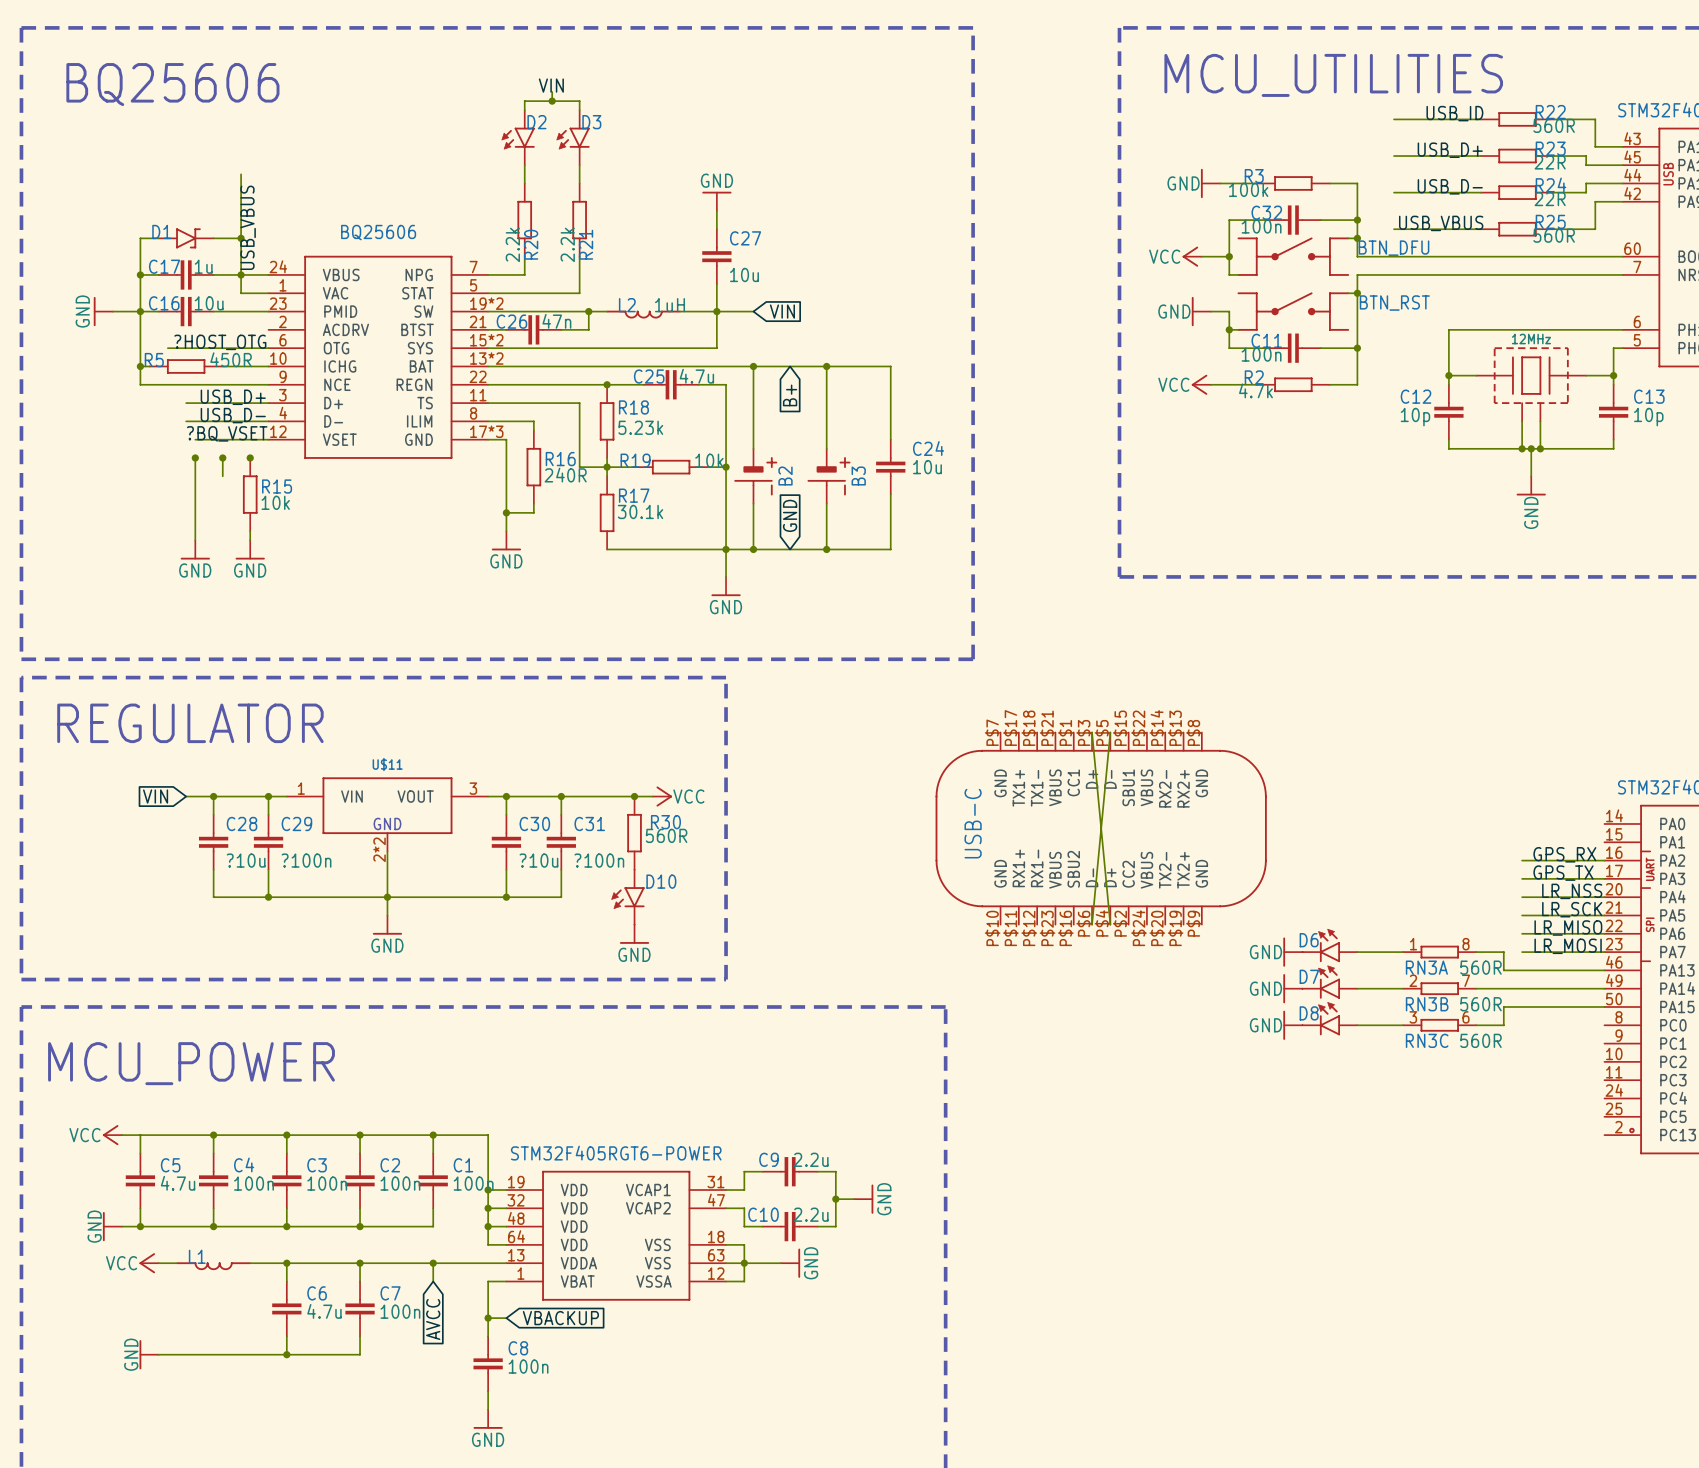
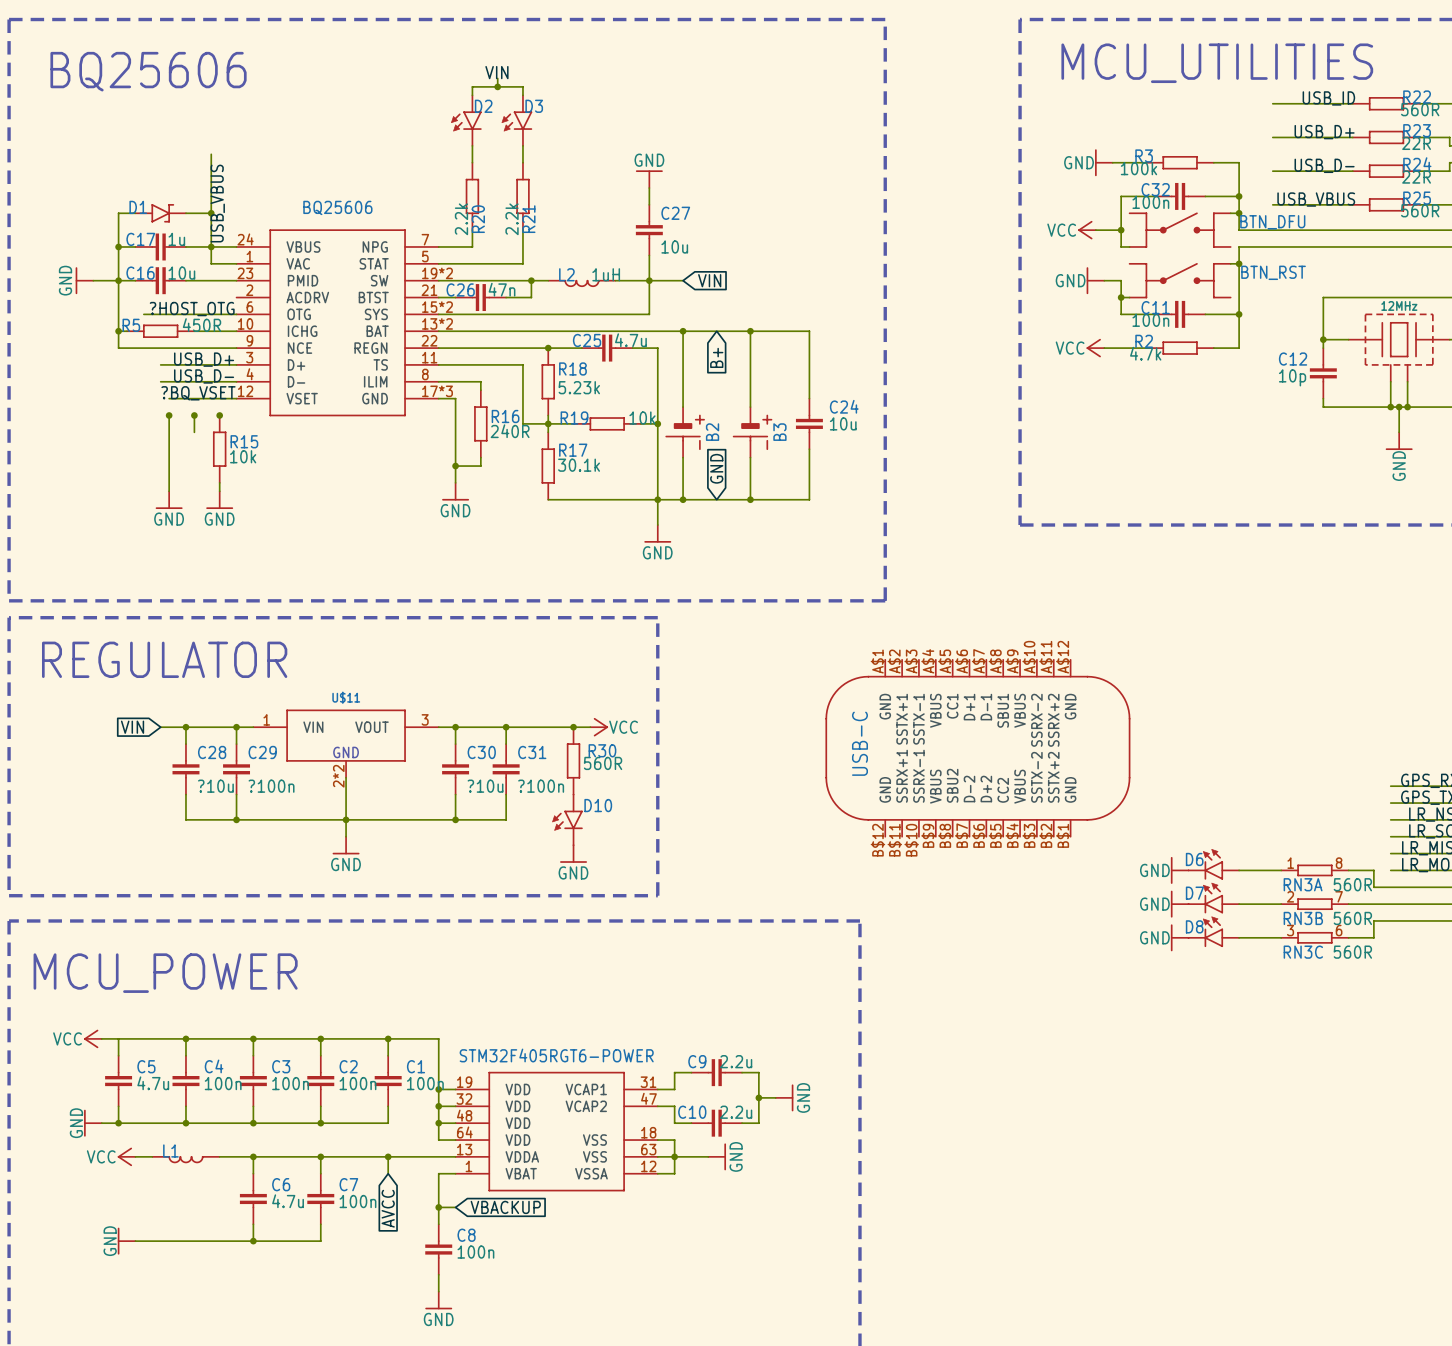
wire: (1092, 732) (1110, 924) -> none
wire: (1110, 732) (1092, 924) -> none
part: none -> (977, 748)
part: (1101, 828) -> none

